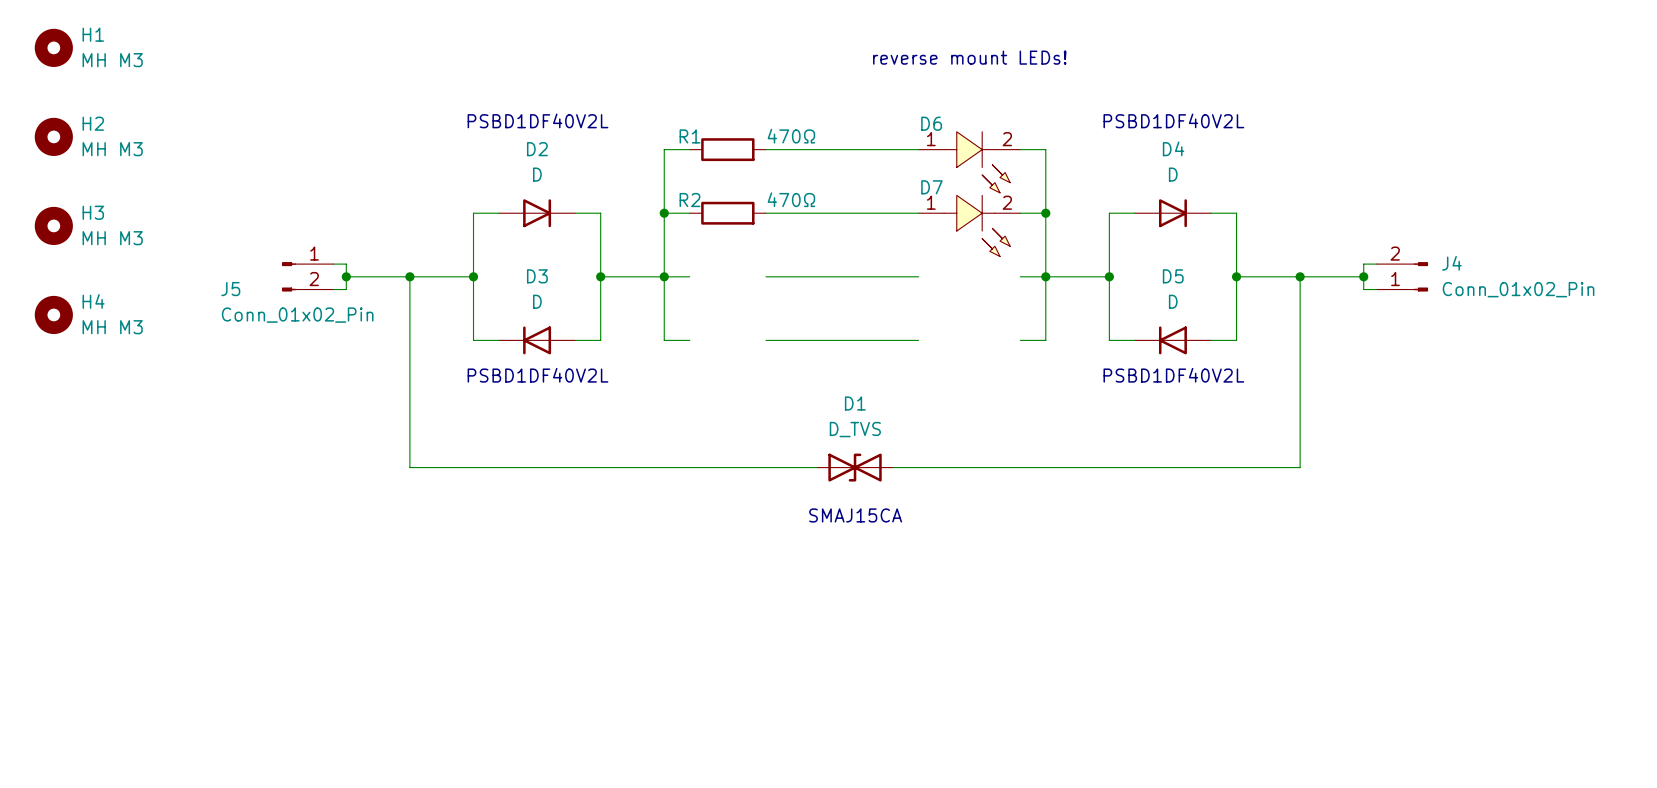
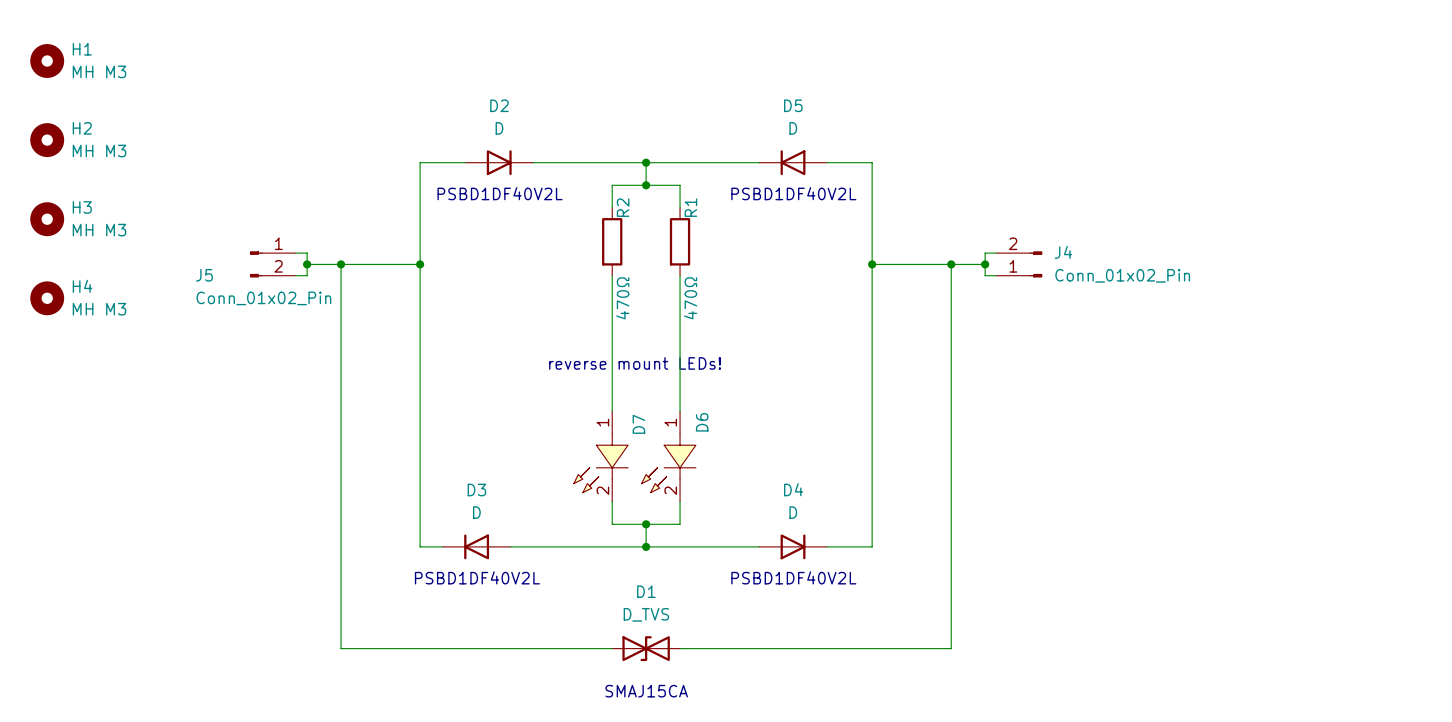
text: reverse mount LEDs! (969, 57) -> none
text position: PSBD1DF40V2L (538, 120) -> PSBD1DF40V2L (500, 193)
text: PSBD1DF40V2L (1173, 120) -> none
wire: (689, 149) (664, 149) (664, 340) (689, 340) -> none
R1 rotation: 0° (727, 149) -> 90° clockwise (680, 241)
R1 position: (727, 149) -> (680, 241)
wire: (766, 149) (918, 149) -> none
wire: (1020, 149) (1045, 149) (1045, 340) (1020, 340) -> none
wire: none -> (533, 162) (759, 162)
wire: none -> (646, 162) (646, 185)
junction: none -> (646, 162)
wire: none -> (826, 162) (872, 162) (872, 546) (826, 546)
D6 position: (969, 162) -> (668, 456)
D6 rotation: 0° (977, 162) -> 90° clockwise (668, 463)
junction: none -> (646, 185)
text: none -> PSBD1DF40V2L (793, 193)
wire: (473, 213) (498, 213) -> (420, 207) (420, 162) (465, 162)
D2 position: (537, 213) -> (499, 162)
wire: (575, 213) (600, 213) (600, 340) (575, 340) -> none
wire: (664, 213) (689, 213) -> (680, 207) (680, 185) (612, 185) (612, 207)
junction: (664, 213) -> none
R2 rotation: 0° (727, 213) -> 90° clockwise (612, 241)
R2 position: (727, 213) -> (612, 241)
wire: (766, 213) (918, 213) -> none
wire: (1020, 213) (1045, 213) -> none
junction: (1045, 213) -> none
wire: (1134, 213) (1109, 213) (1109, 264) -> (996, 253) (985, 253)
D4 position: (1172, 213) -> (793, 546)
wire: (1211, 213) (1236, 213) (1236, 340) (1211, 340) -> none
D7 position: (969, 225) -> (600, 456)
D7 rotation: 0° (977, 225) -> 90° clockwise (600, 463)
wire: (1376, 264) (1363, 264) (1363, 289) (1376, 289) -> none
wire: none -> (341, 264) (341, 648) (612, 648)
wire: (409, 276) (409, 467) (816, 467) -> none
junction position: (409, 276) -> (341, 264)
wire: (600, 276) (689, 276) -> none
junction: (600, 276) -> none
junction: (664, 276) -> none
wire: (766, 276) (918, 276) -> none
wire: none -> (872, 264) (906, 264)
junction: none -> (872, 264)
junction position: (1045, 276) -> (951, 264)
wire: none -> (951, 264) (951, 648) (680, 648)
wire: (1236, 276) (1363, 276) -> none
junction: (1236, 276) -> none
wire: (1300, 276) (1300, 467) (893, 467) -> none
junction: (1300, 276) -> none
junction: (1363, 276) -> none
J4 position: (1402, 276) -> (1019, 264)
wire: none -> (612, 275) (612, 411)
wire: none -> (680, 275) (680, 411)
wire: (1109, 289) (1109, 340) (1134, 340) -> (985, 275) (996, 275)
wire: (473, 340) (498, 340) -> (420, 320) (420, 546) (442, 546)
D3 position: (537, 340) -> (476, 546)
wire: (766, 340) (918, 340) -> none
D5 position: (1172, 340) -> (793, 162)
text: PSBD1DF40V2L (538, 375) -> none
text: PSBD1DF40V2L (1173, 375) -> none
text: none -> reverse mount LEDs! (635, 363)
D1 position: (855, 467) -> (646, 648)
text: SMAJ15CA (855, 515) -> none
wire: none -> (612, 501) (612, 524) (680, 524) (680, 501)
wire: none -> (646, 524) (646, 546)
junction: none -> (646, 524)
wire: none -> (510, 546) (759, 546)
junction: none -> (646, 546)
text: none -> PSBD1DF40V2L (477, 577)
text: none -> PSBD1DF40V2L (793, 577)
text: none -> SMAJ15CA (646, 691)

